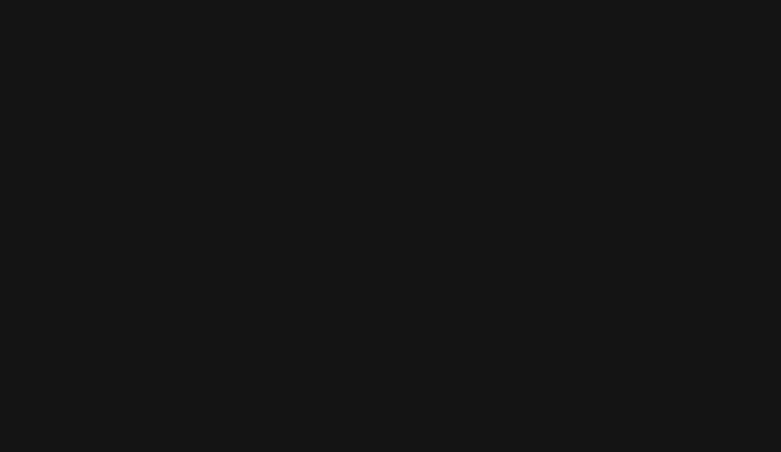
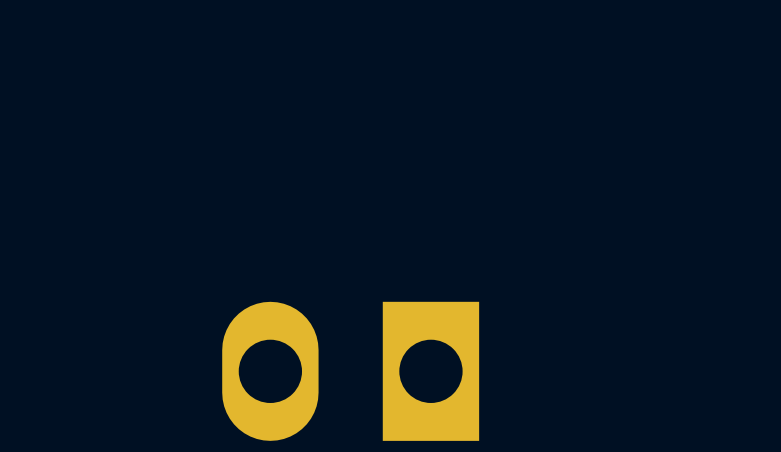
part: none -> (350, 371)

